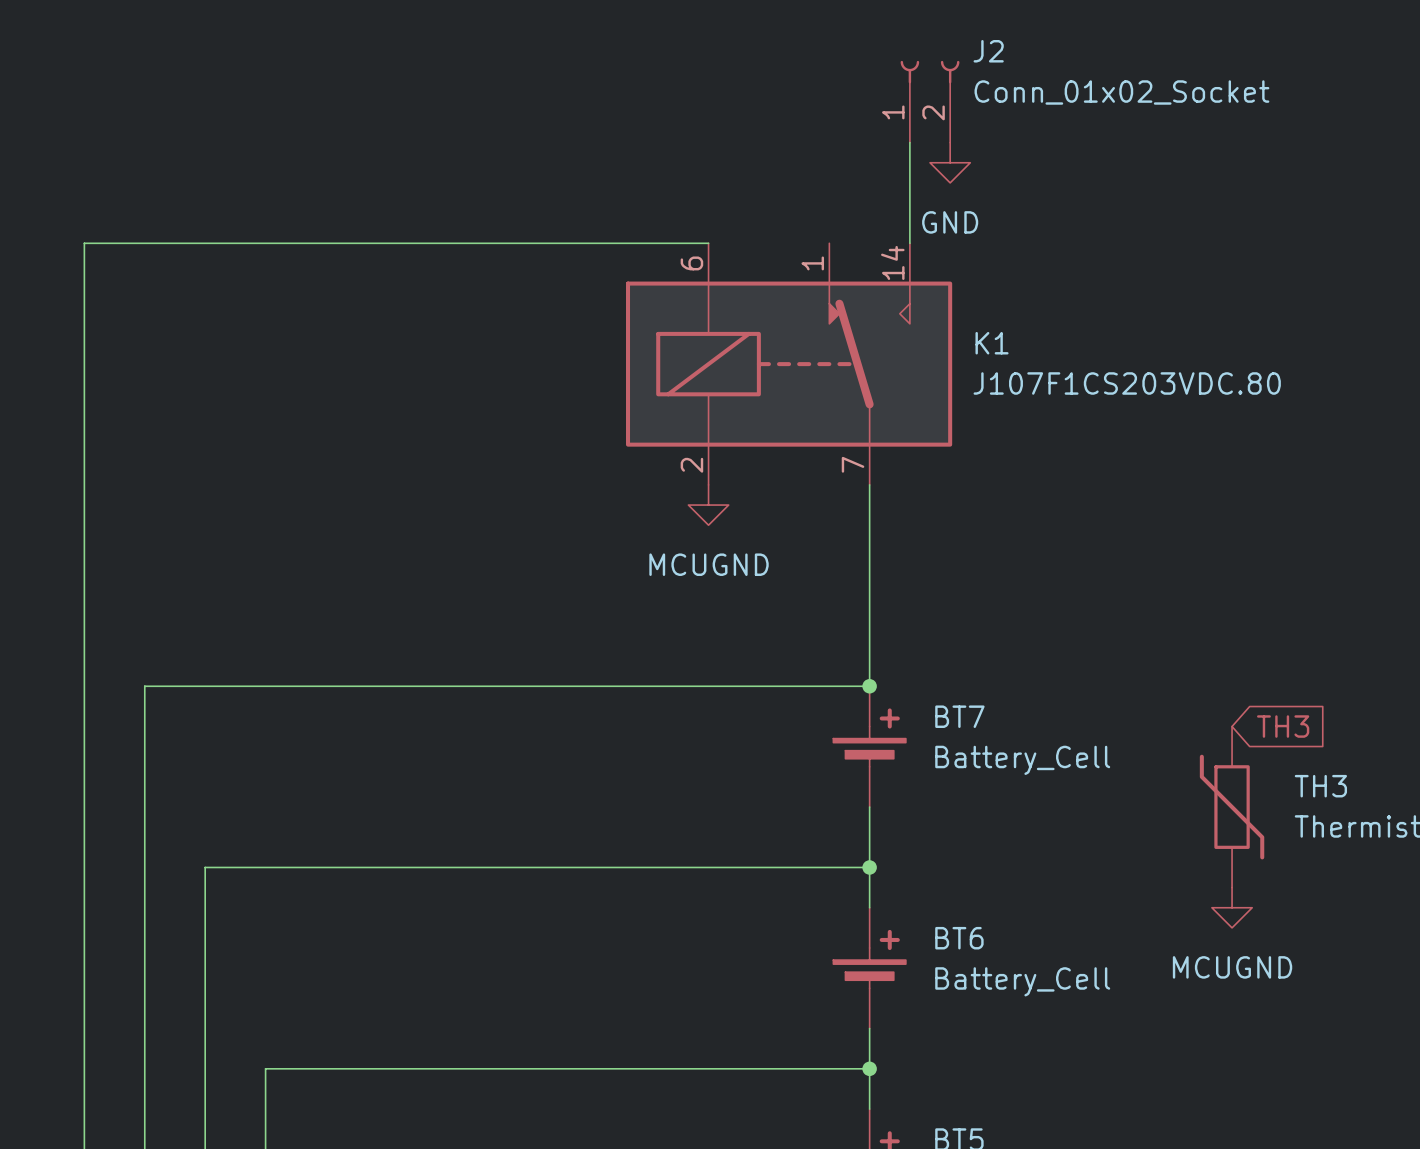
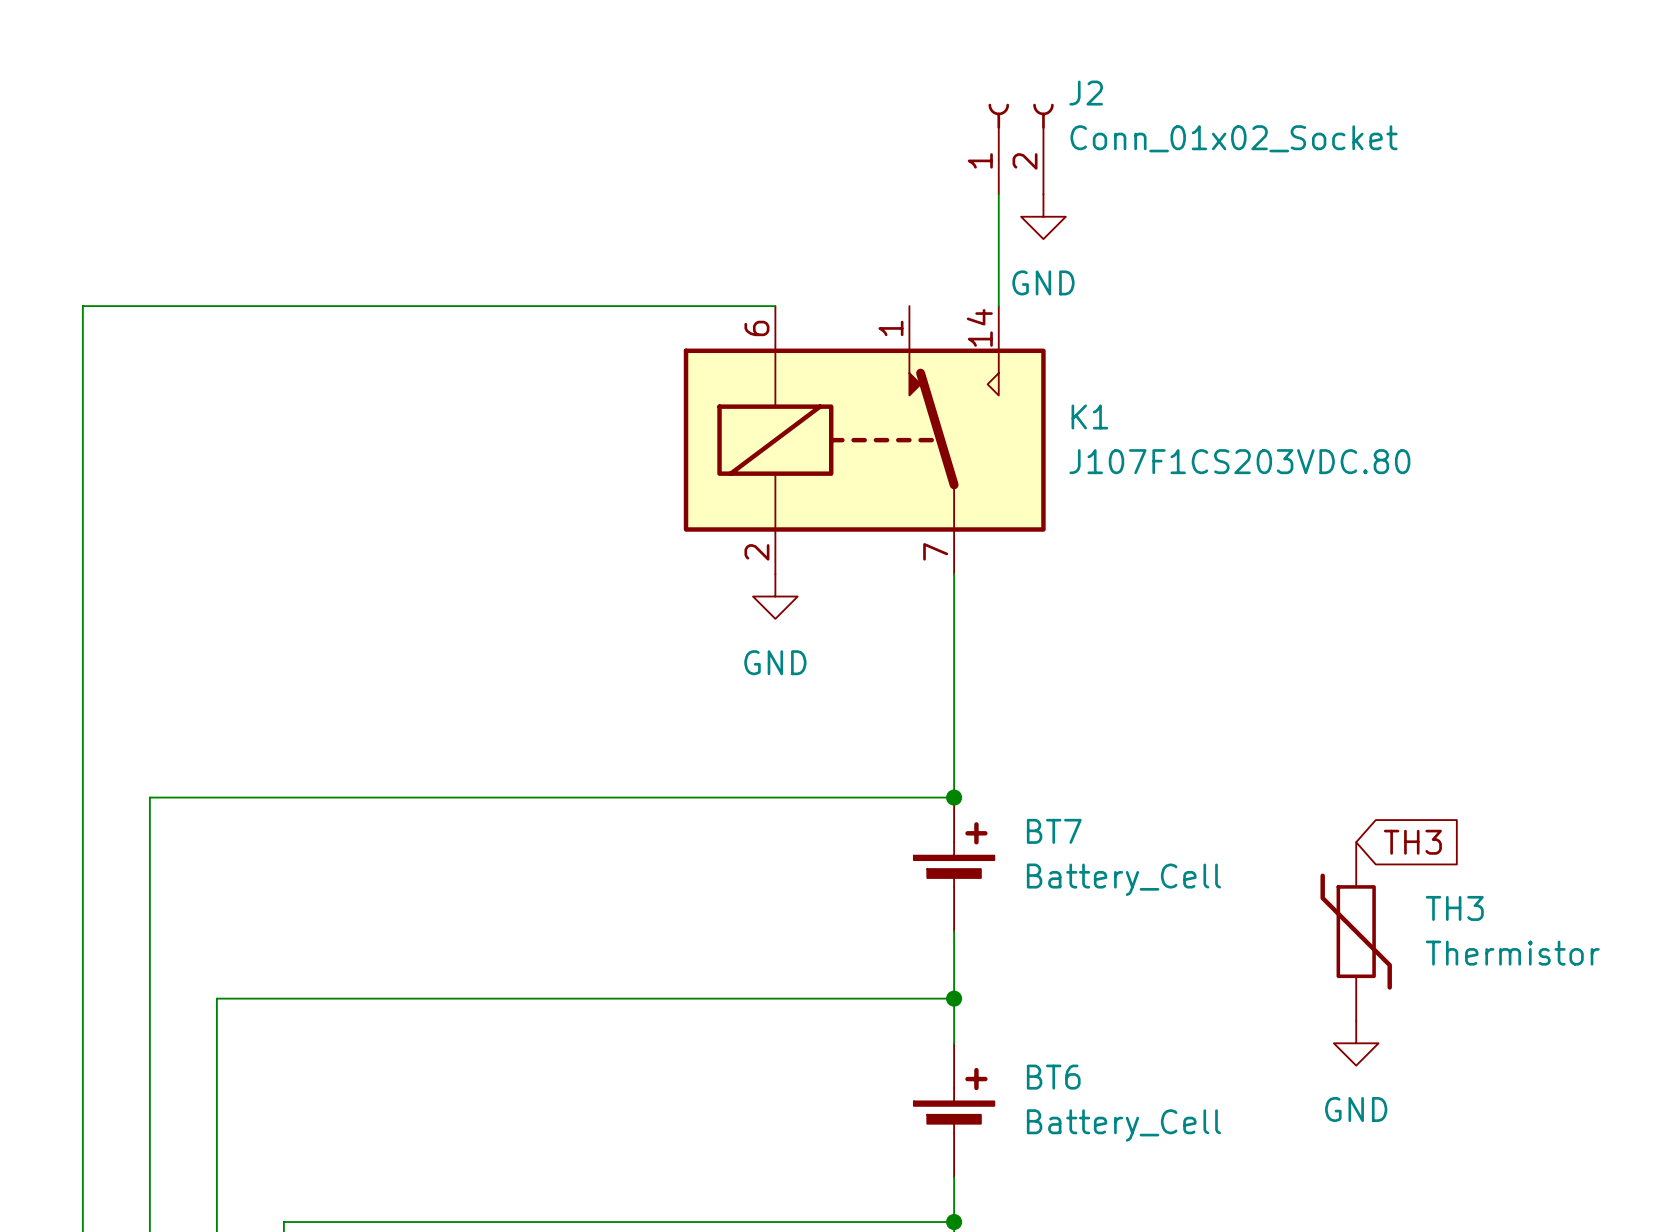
power symbol: MCUGND (708, 505) -> GND (775, 596)
power symbol: MCUGND (1232, 907) -> GND (1356, 1043)

